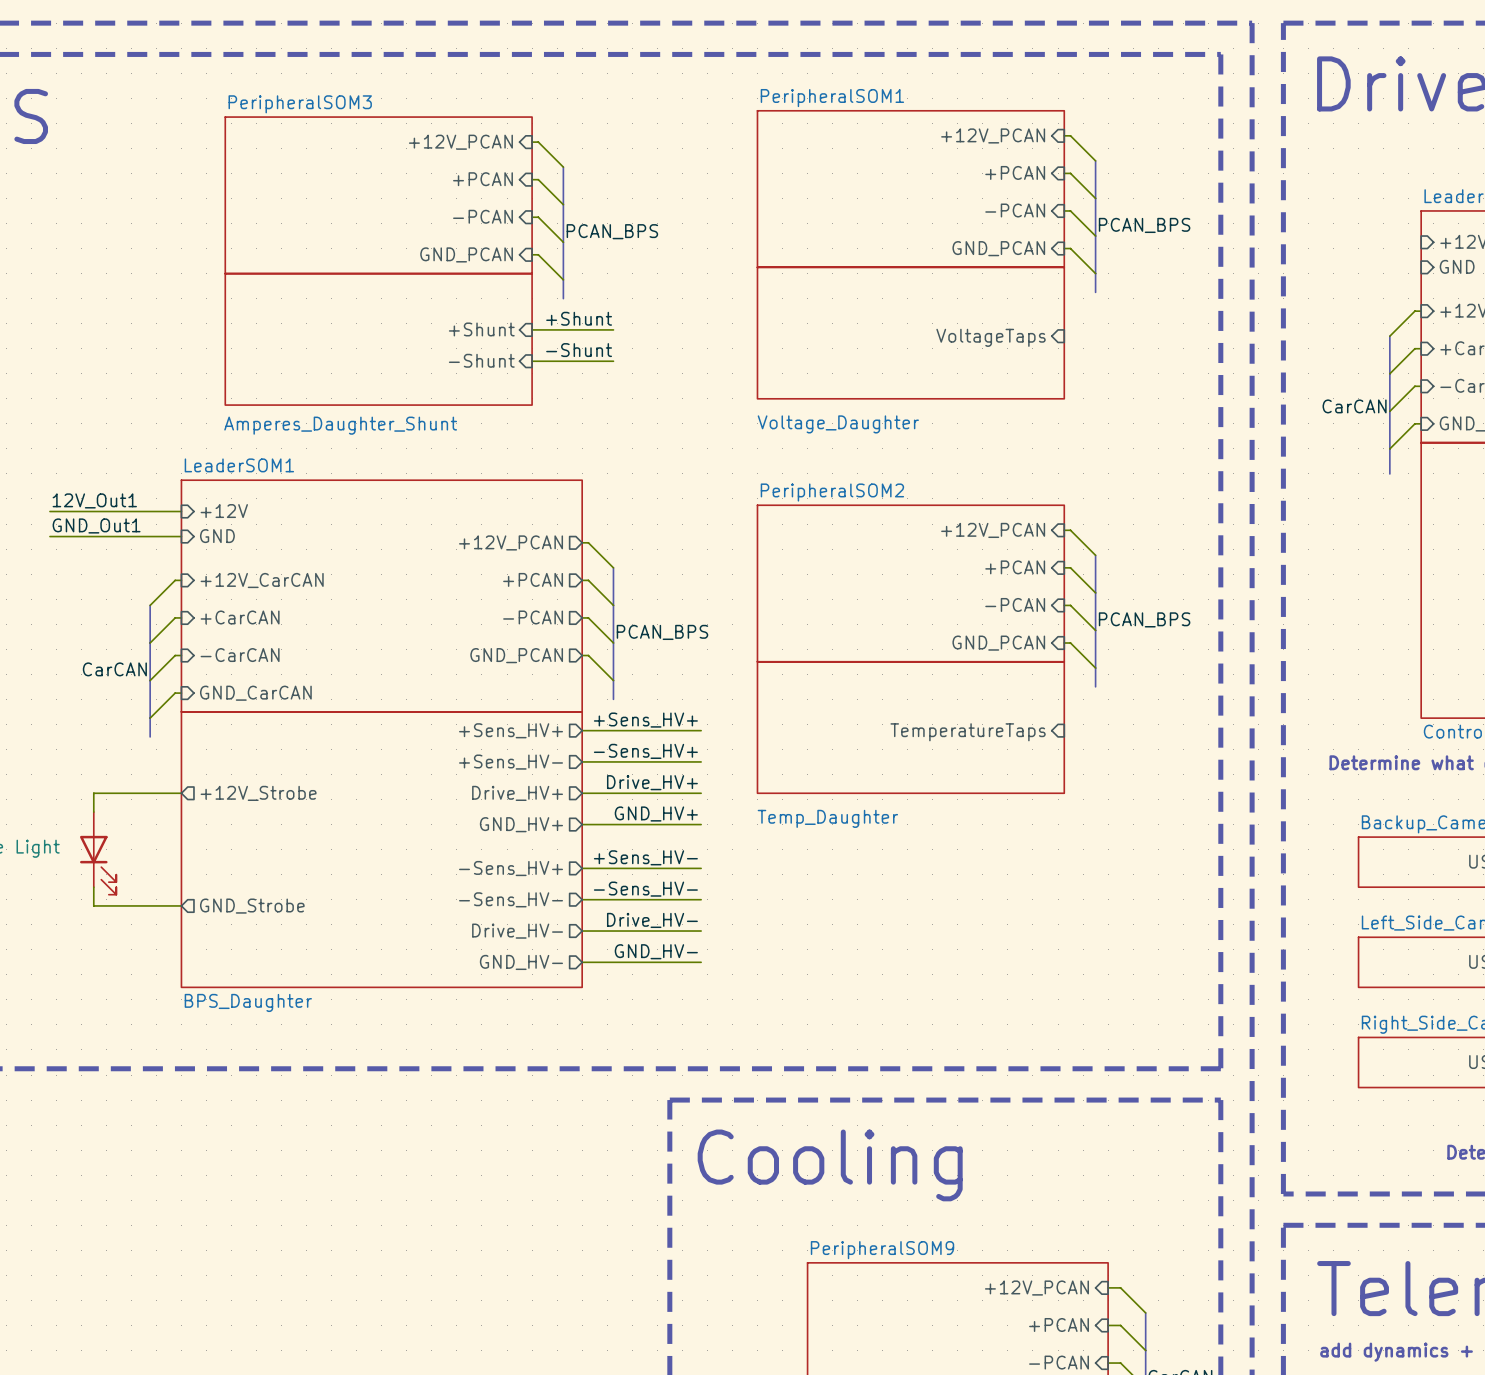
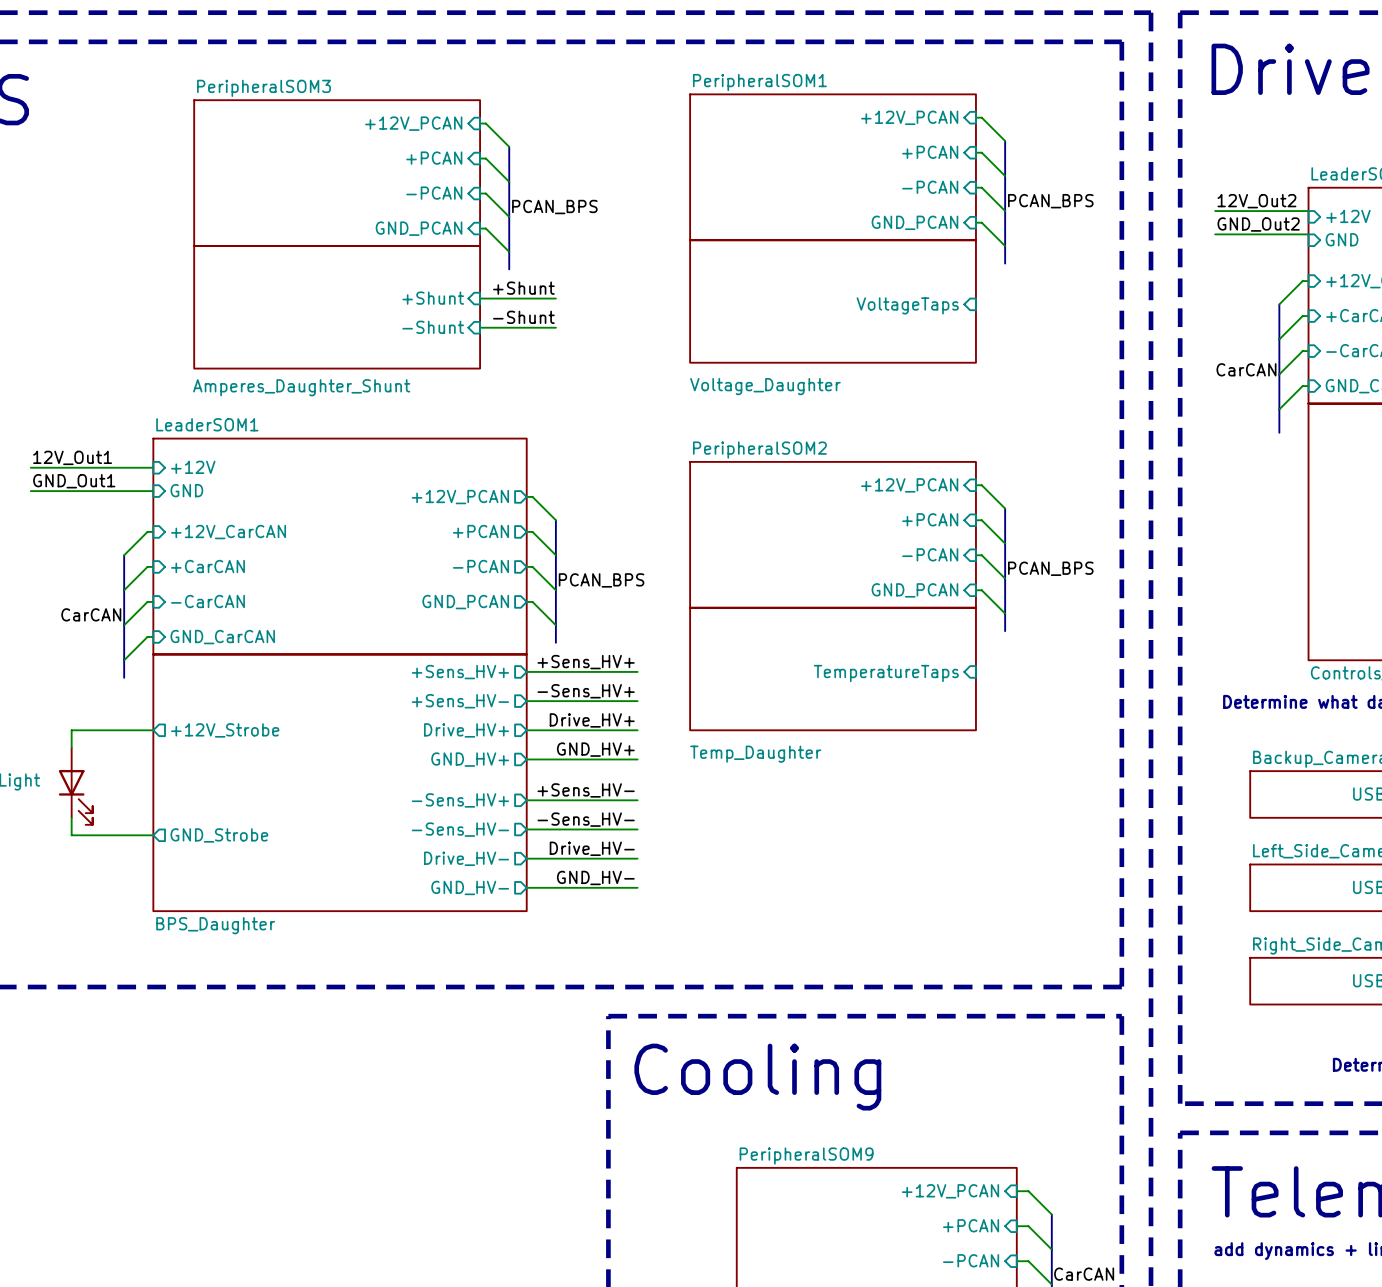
label: none -> 12V_Out2 (1256, 201)
wire: none -> (1215, 211) (1308, 211)
label: none -> GND_Out2 (1258, 224)
wire: none -> (1215, 234) (1308, 234)

